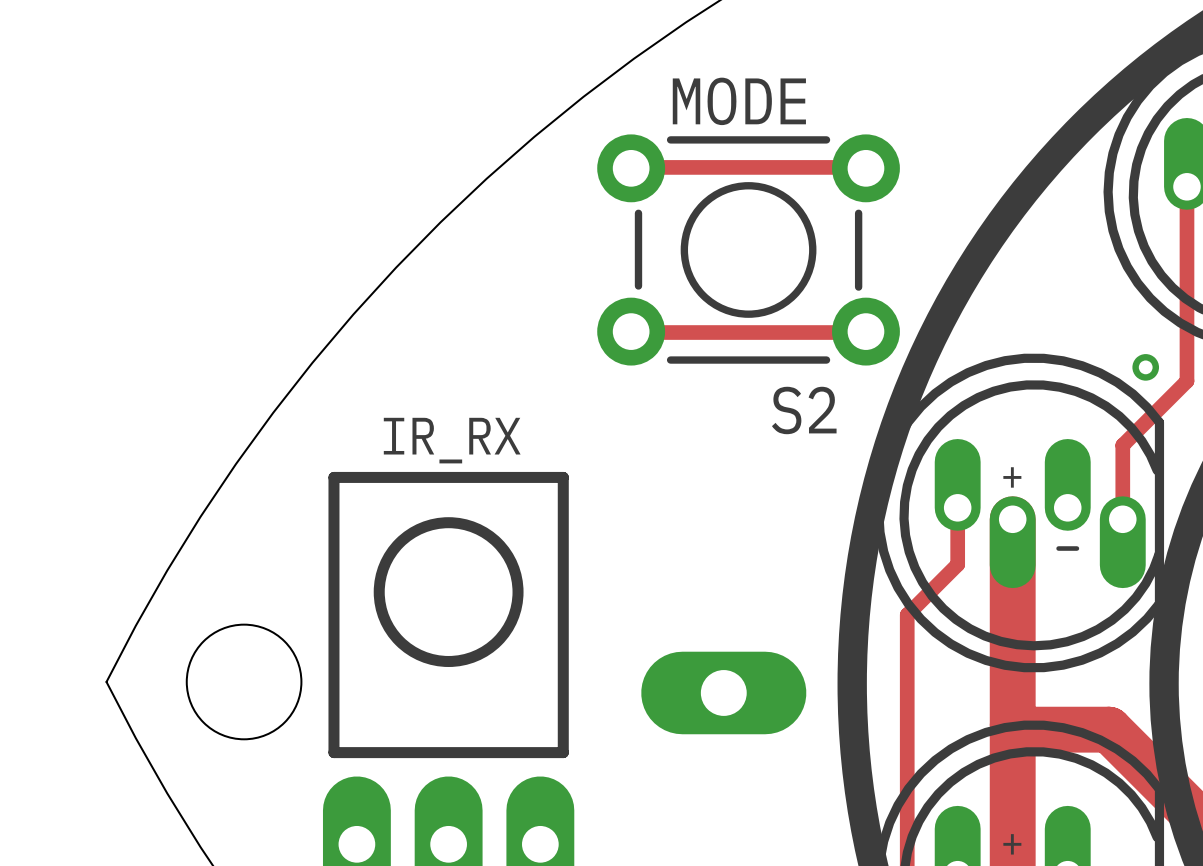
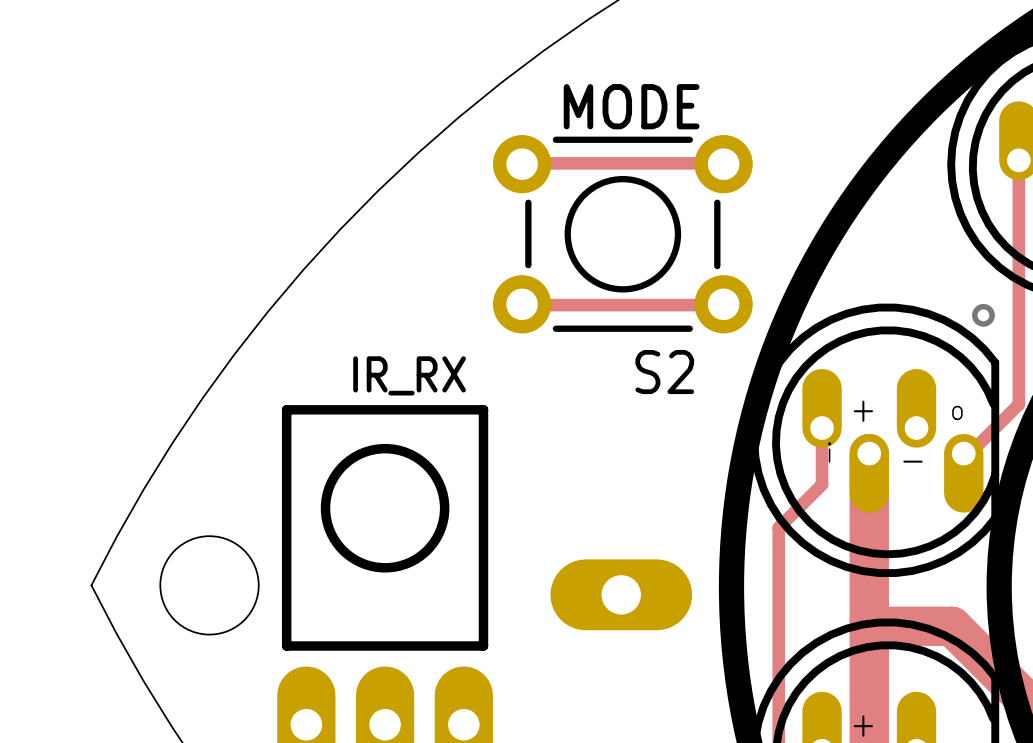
text position: MODE (739, 101) -> MODE (631, 106)
S2 position: (748, 249) -> (622, 234)
part footprint: [874, 353, 1165, 673] -> [750, 303, 1000, 578]
track: (1186, 381) (1122, 445) (1122, 519) -> (1018, 327) (1018, 404) (969, 453) (963, 453)
text position: IR_RX (452, 440) -> IR_RX (409, 375)

